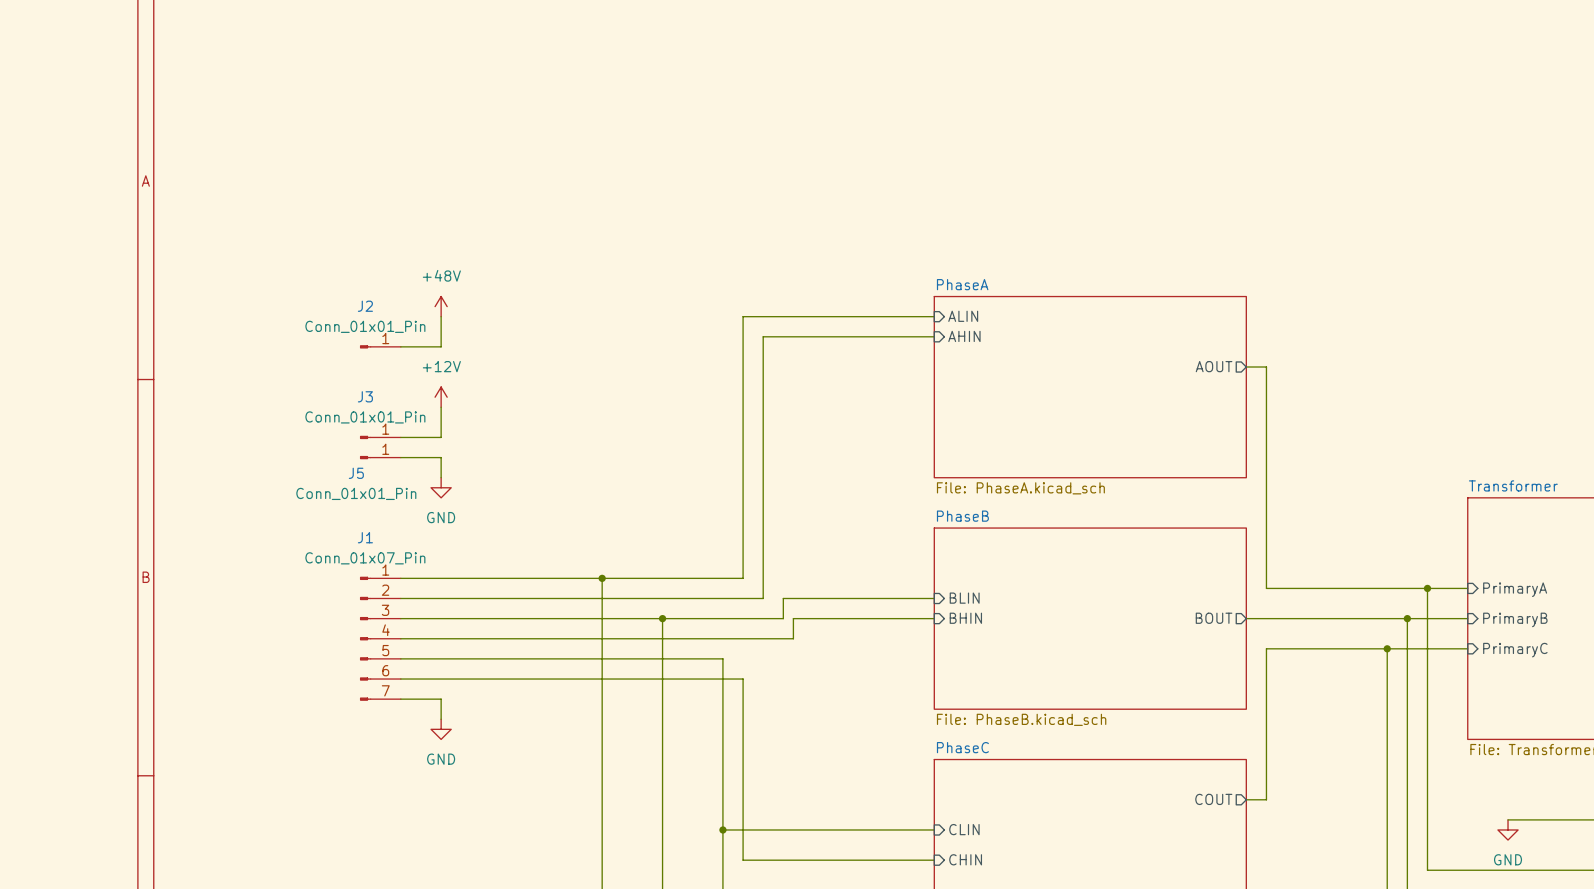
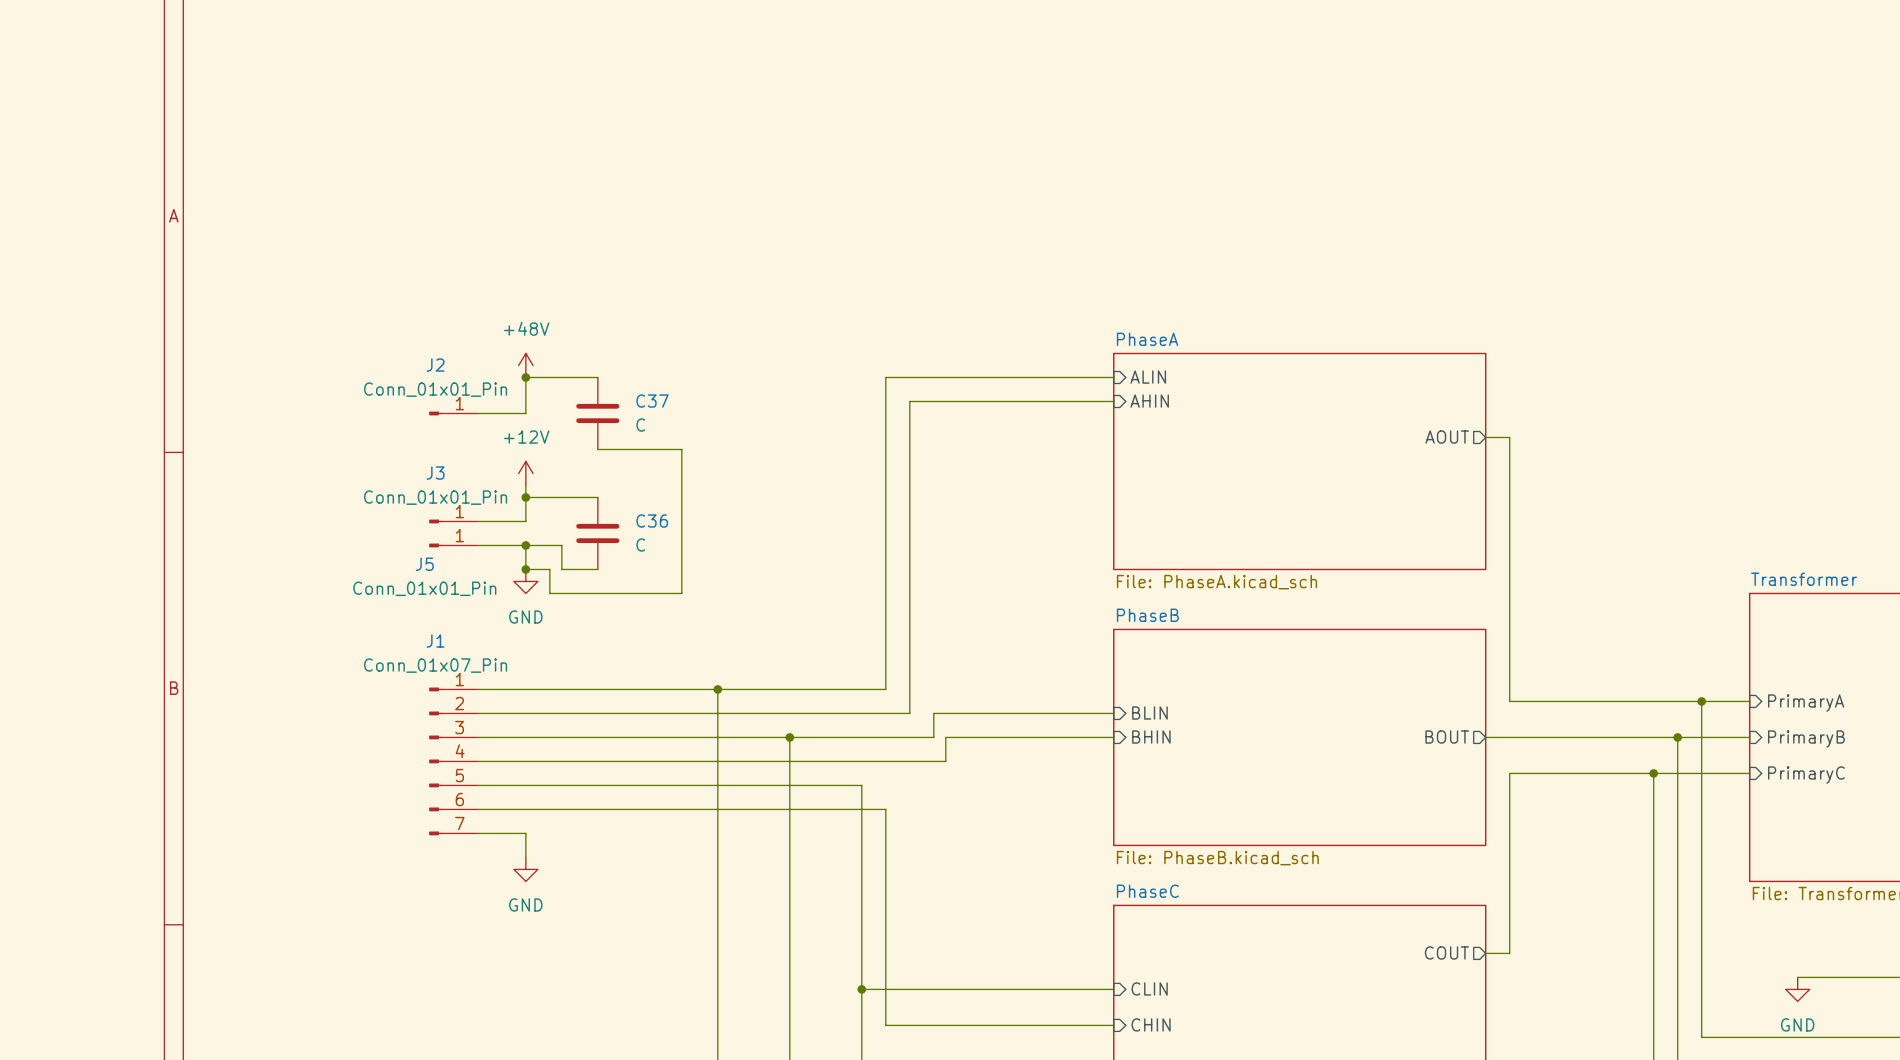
wire: none -> (525, 377) (597, 377)
junction: none -> (525, 377)
C37: none -> C (597, 413)
wire: none -> (597, 449) (681, 449) (681, 593) (549, 593) (549, 569) (525, 569)
wire: none -> (525, 497) (597, 497)
junction: none -> (525, 497)
C36: none -> C (597, 533)
wire: none -> (525, 545) (561, 545) (561, 569) (597, 569)
junction: none -> (525, 545)
junction: none -> (525, 569)

